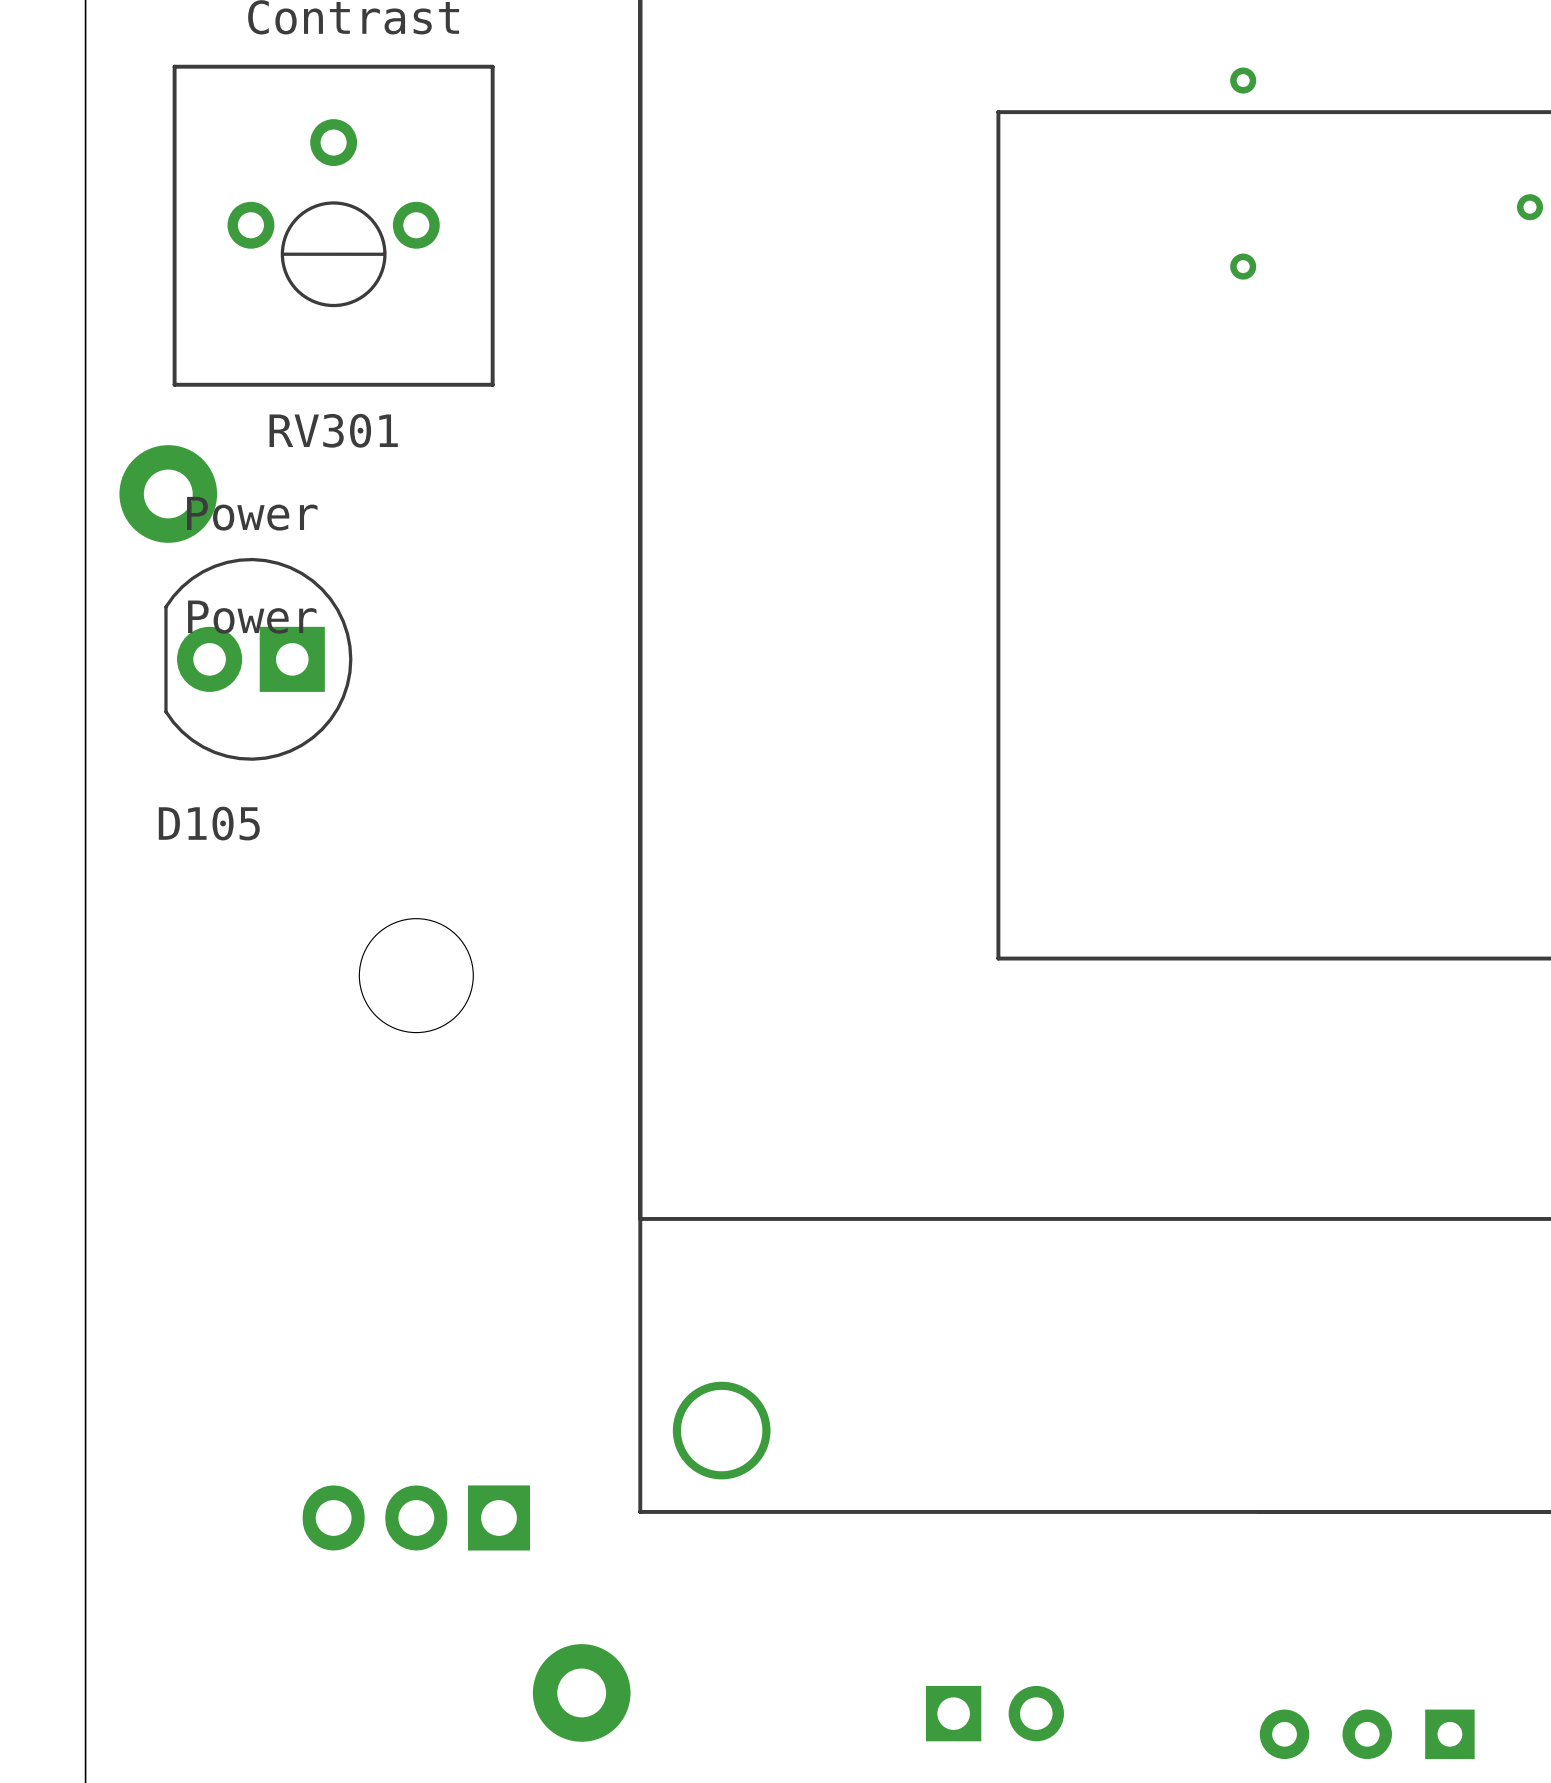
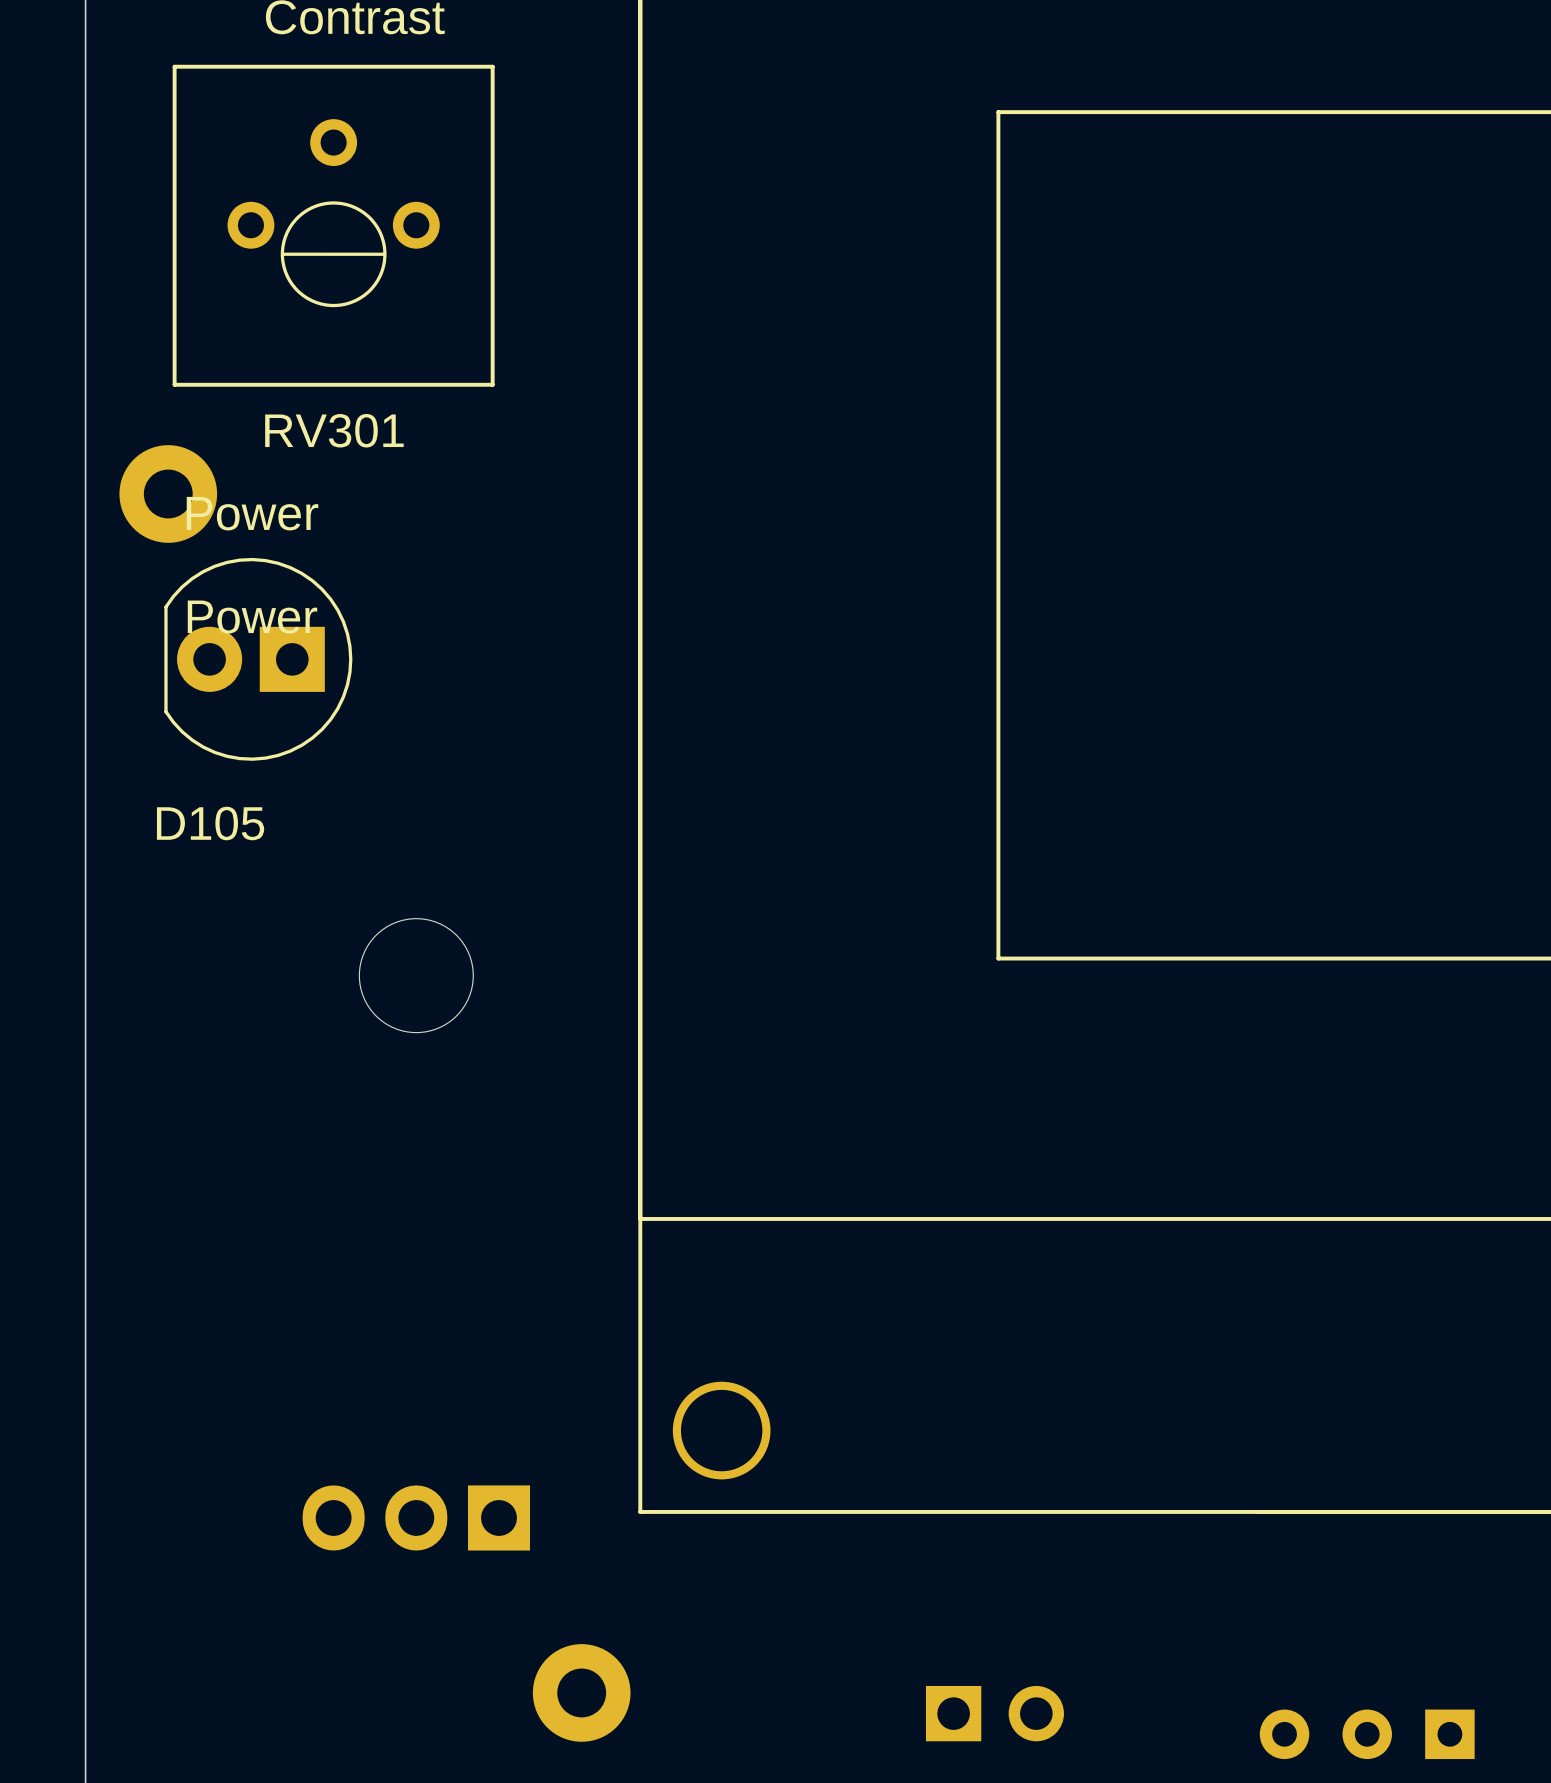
via: (1243, 80) -> none
via: (1529, 207) -> none
via: (1243, 266) -> none

